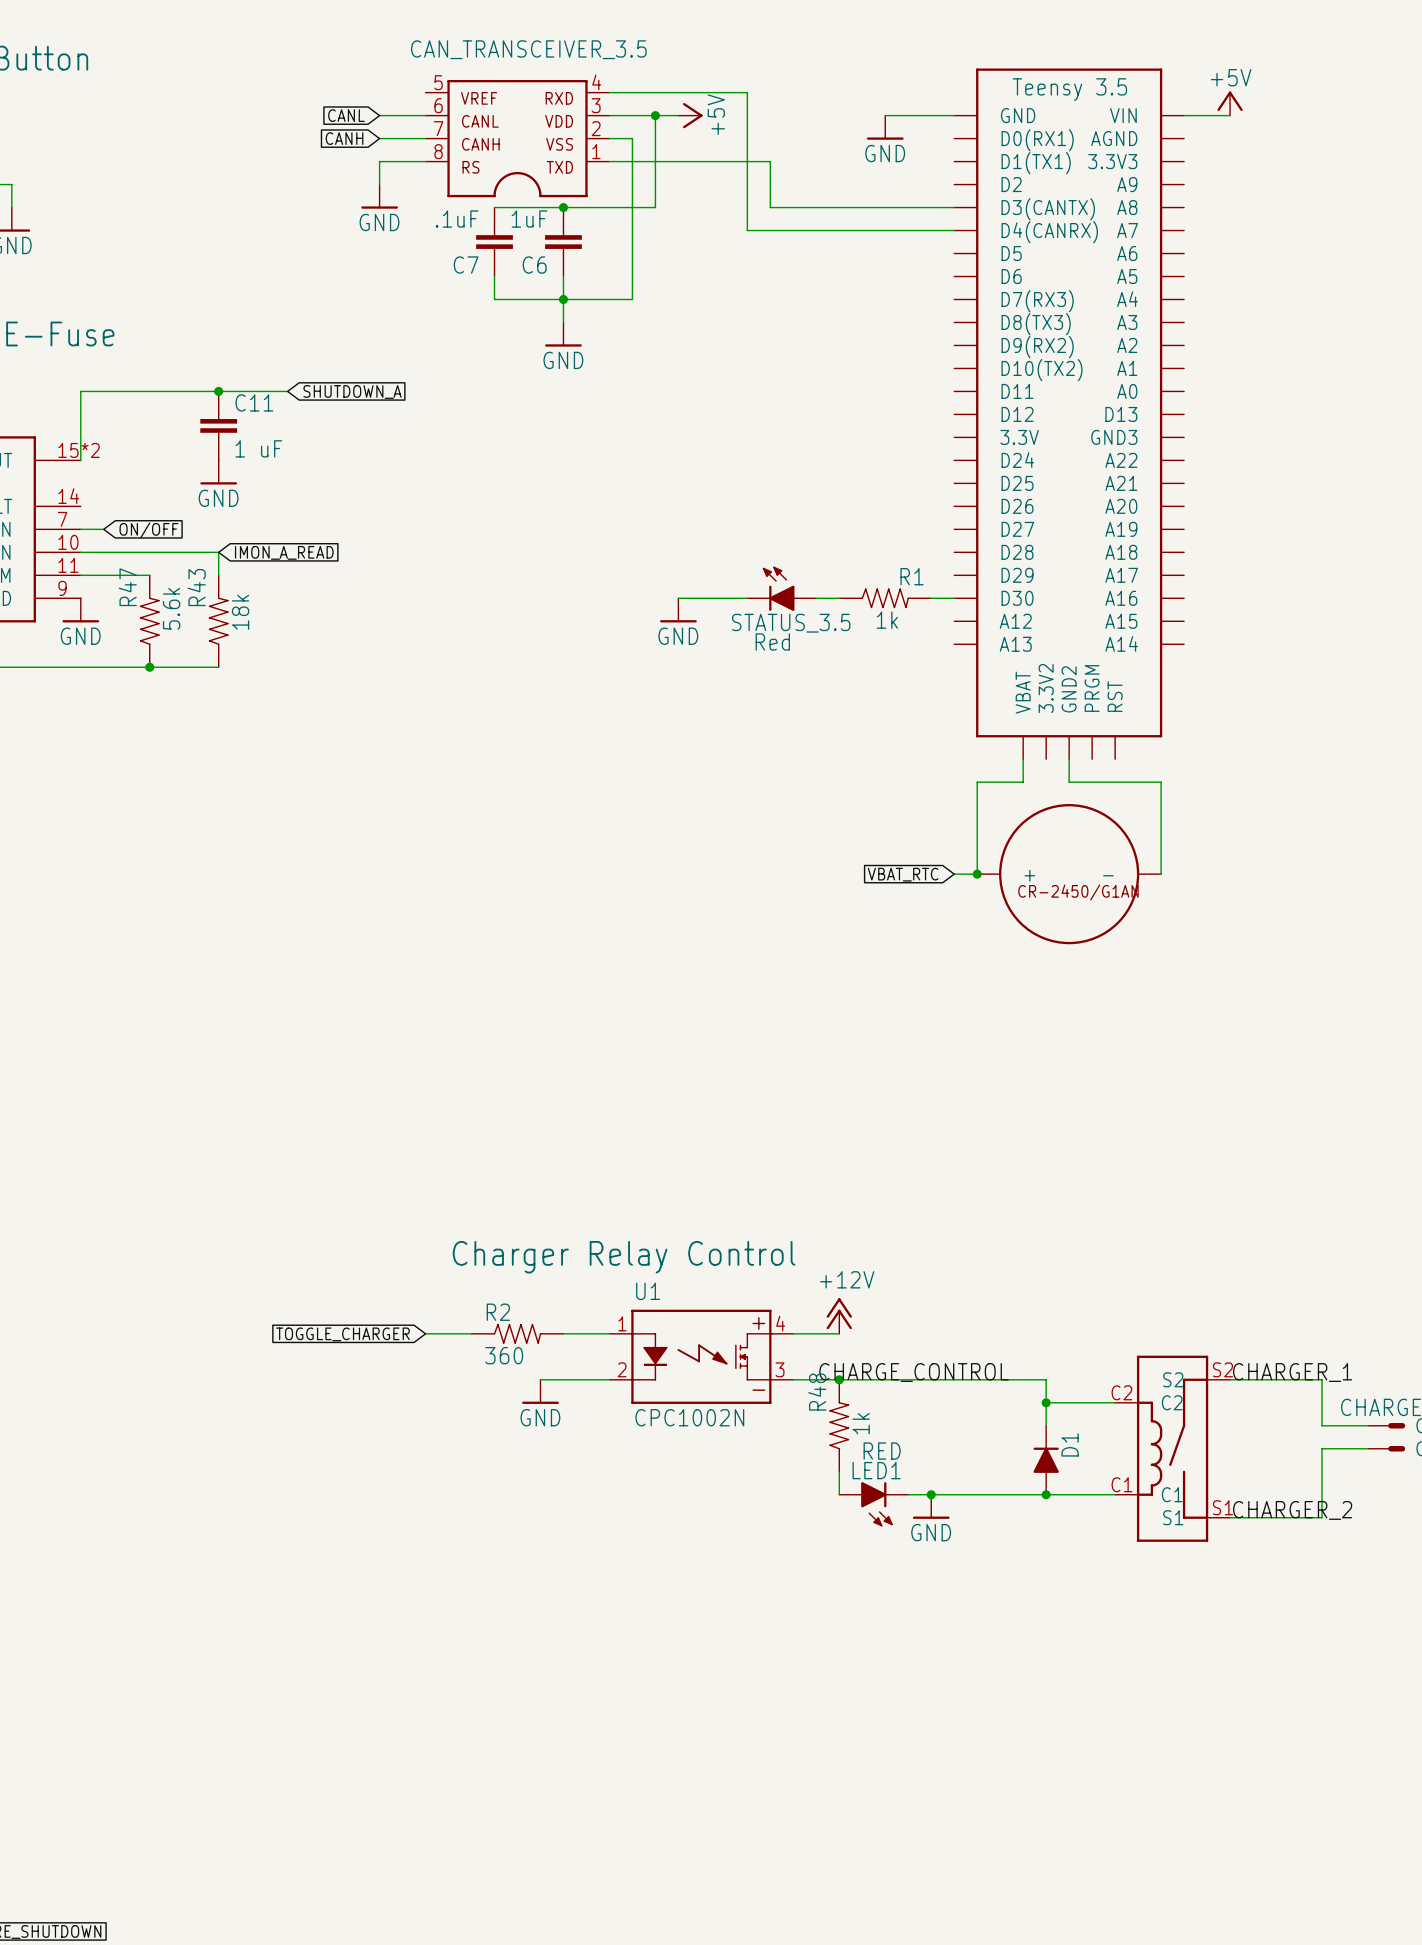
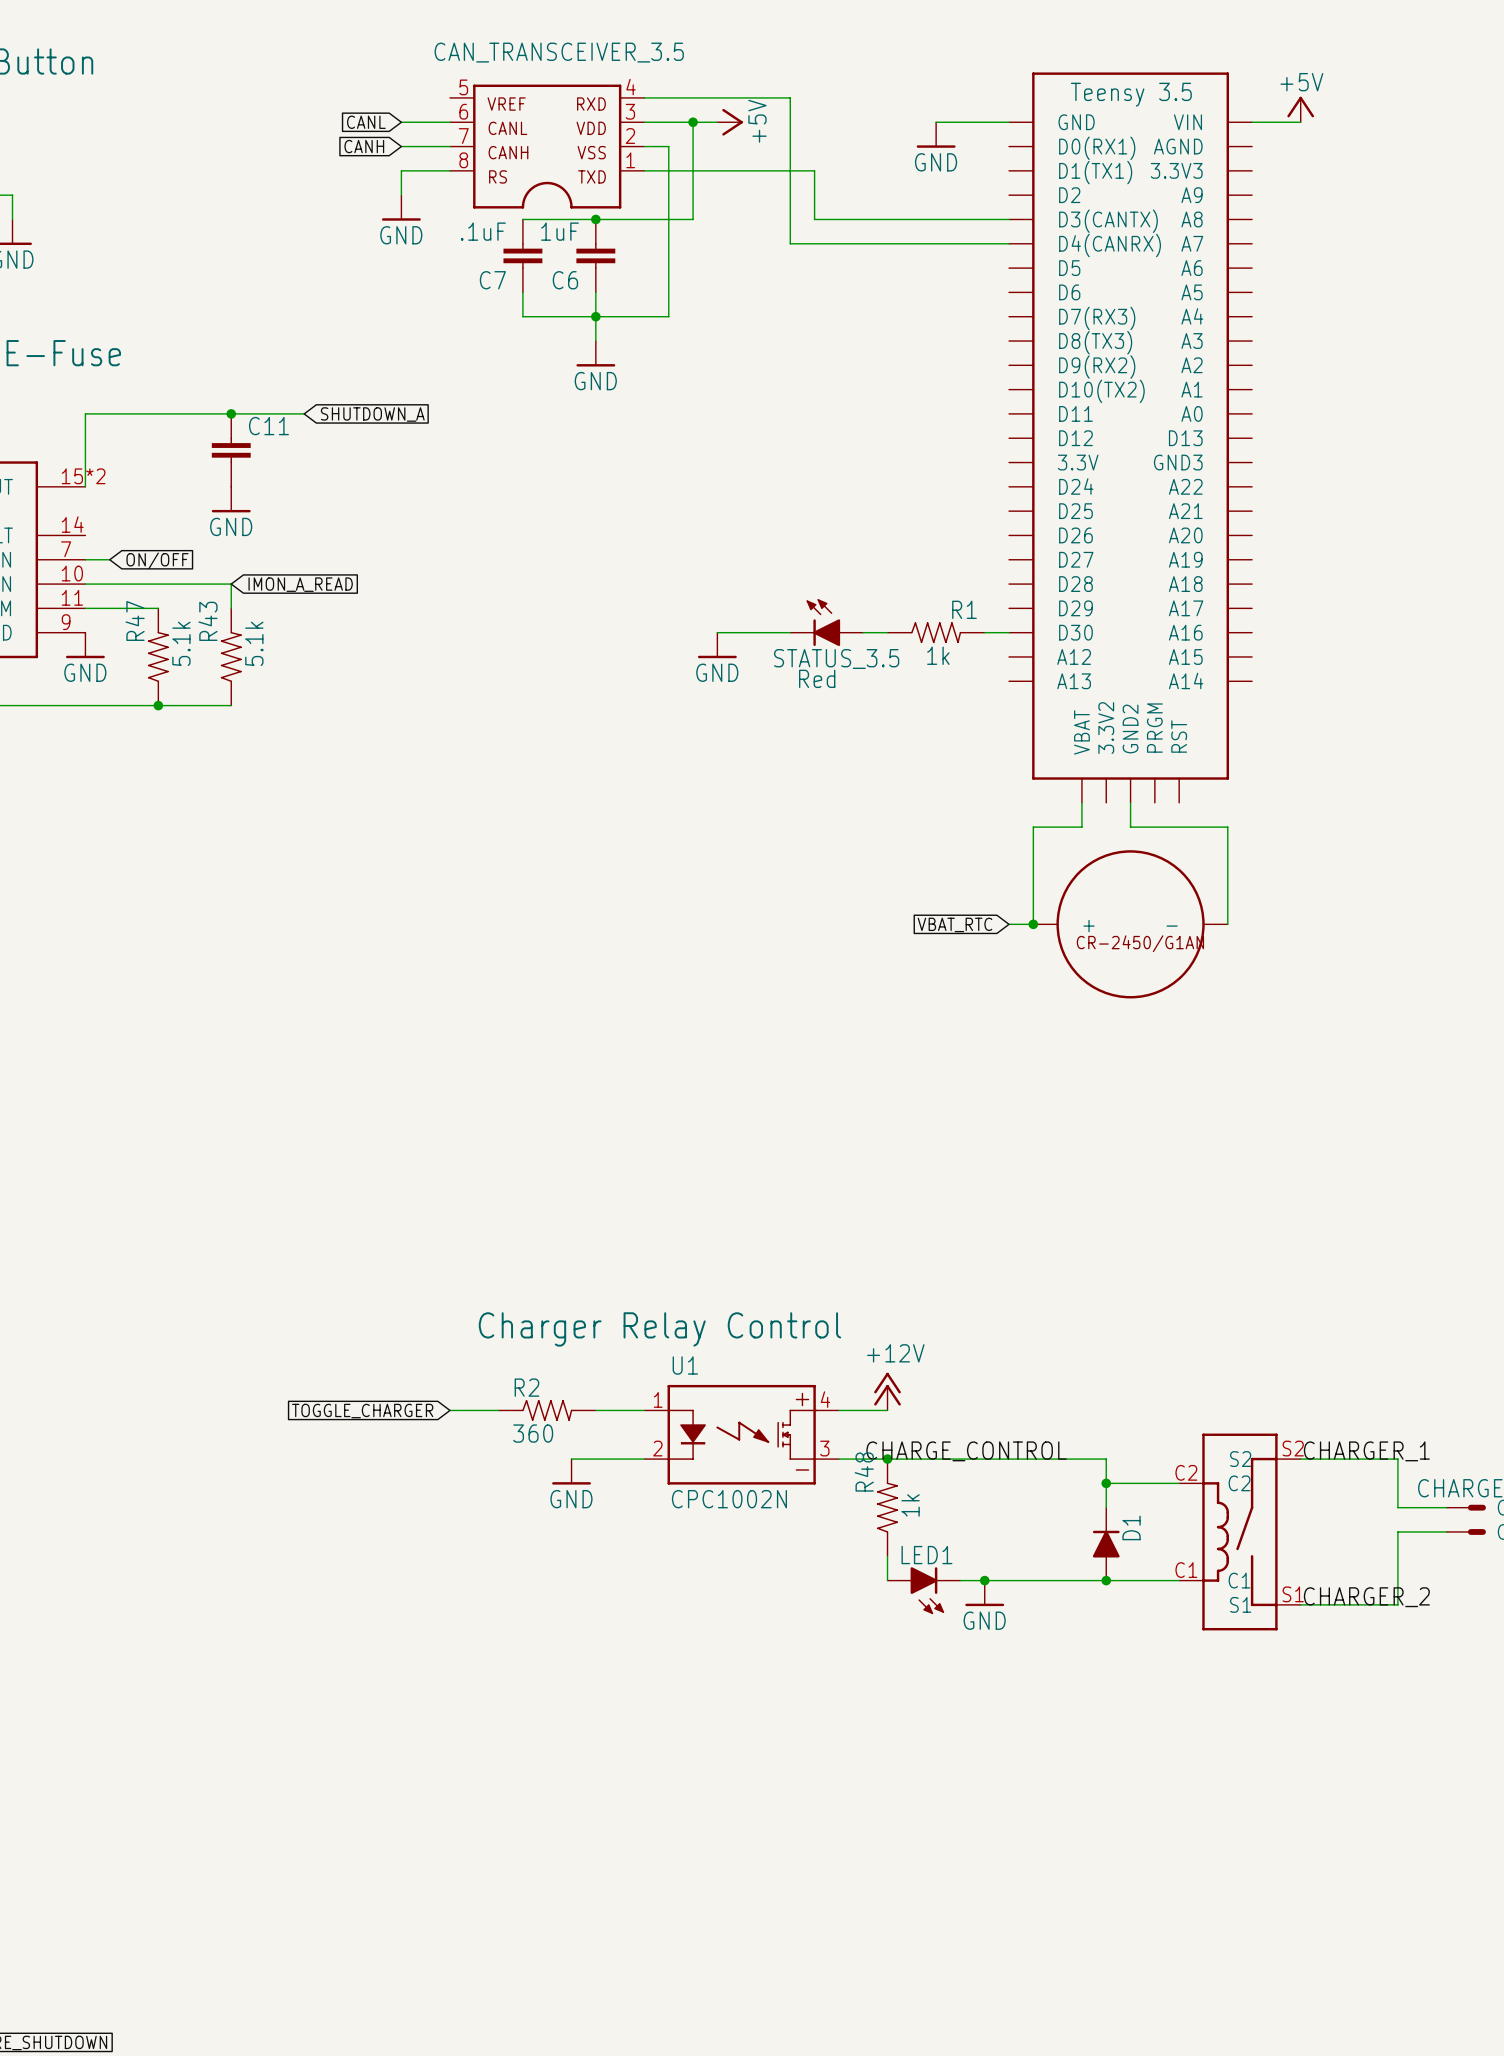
C11 value: 1 uF (258, 448) -> none
R47 value: 5.6k (171, 608) -> 5.1k (181, 643)
R43 value: 18k (240, 612) -> 5.1k (254, 643)
LED1 value: RED (882, 1451) -> none

